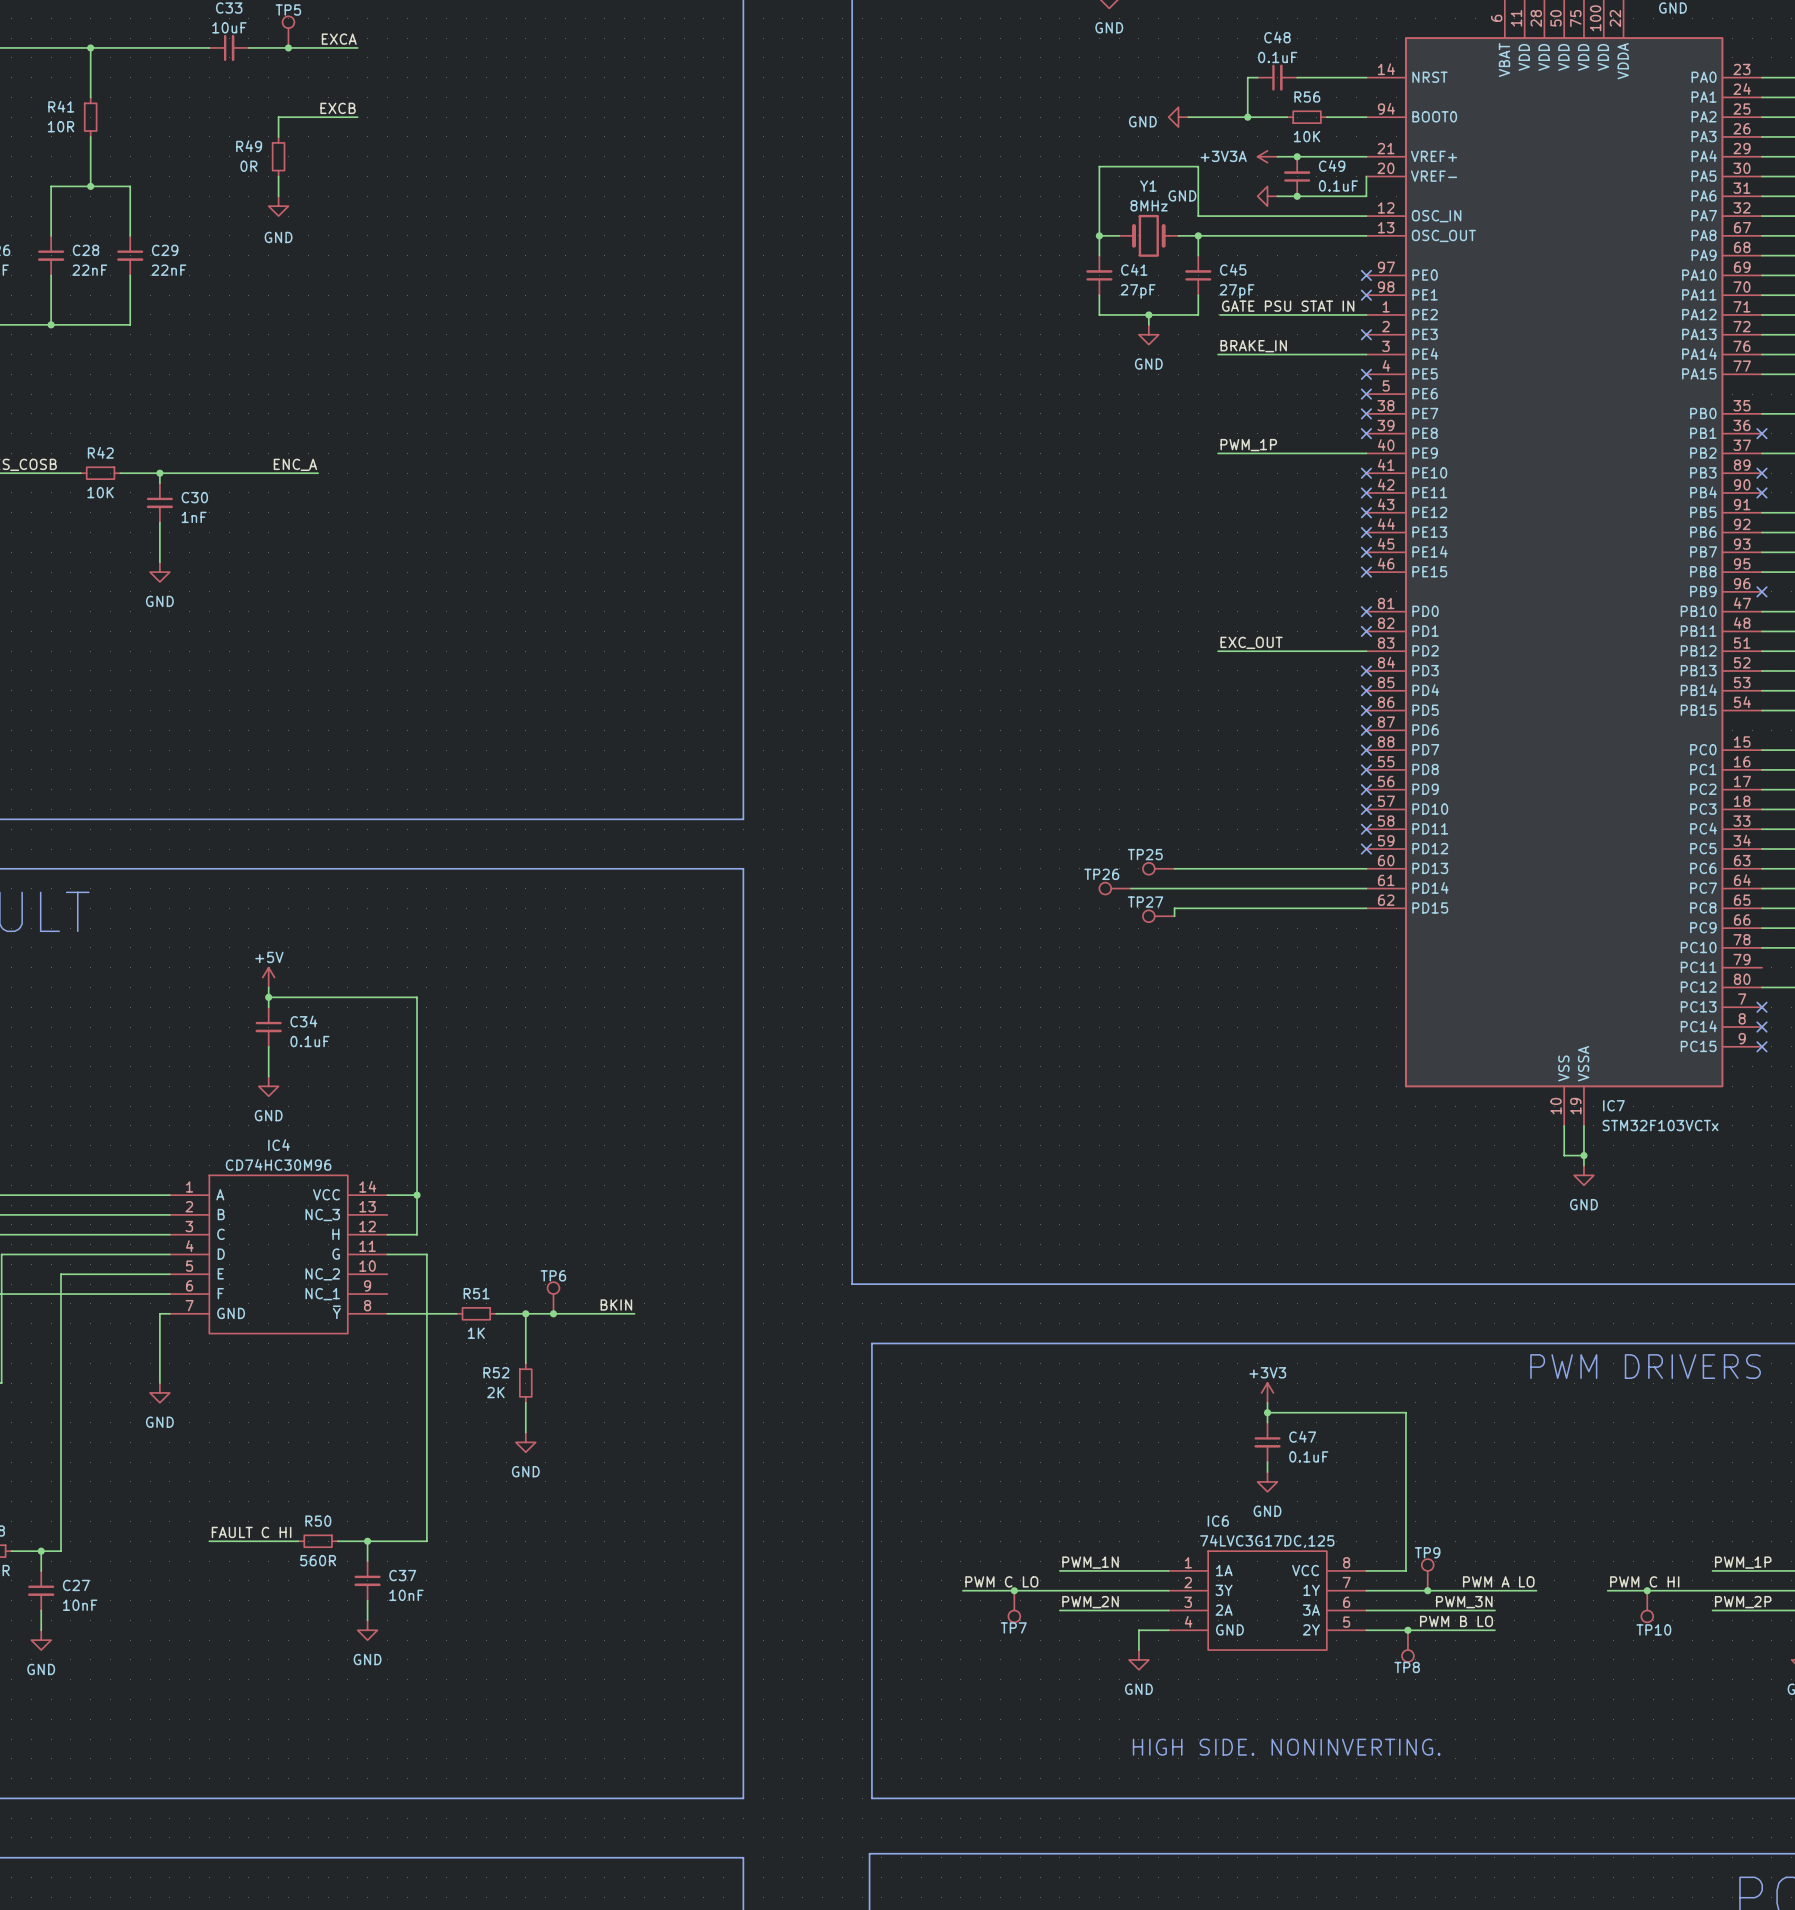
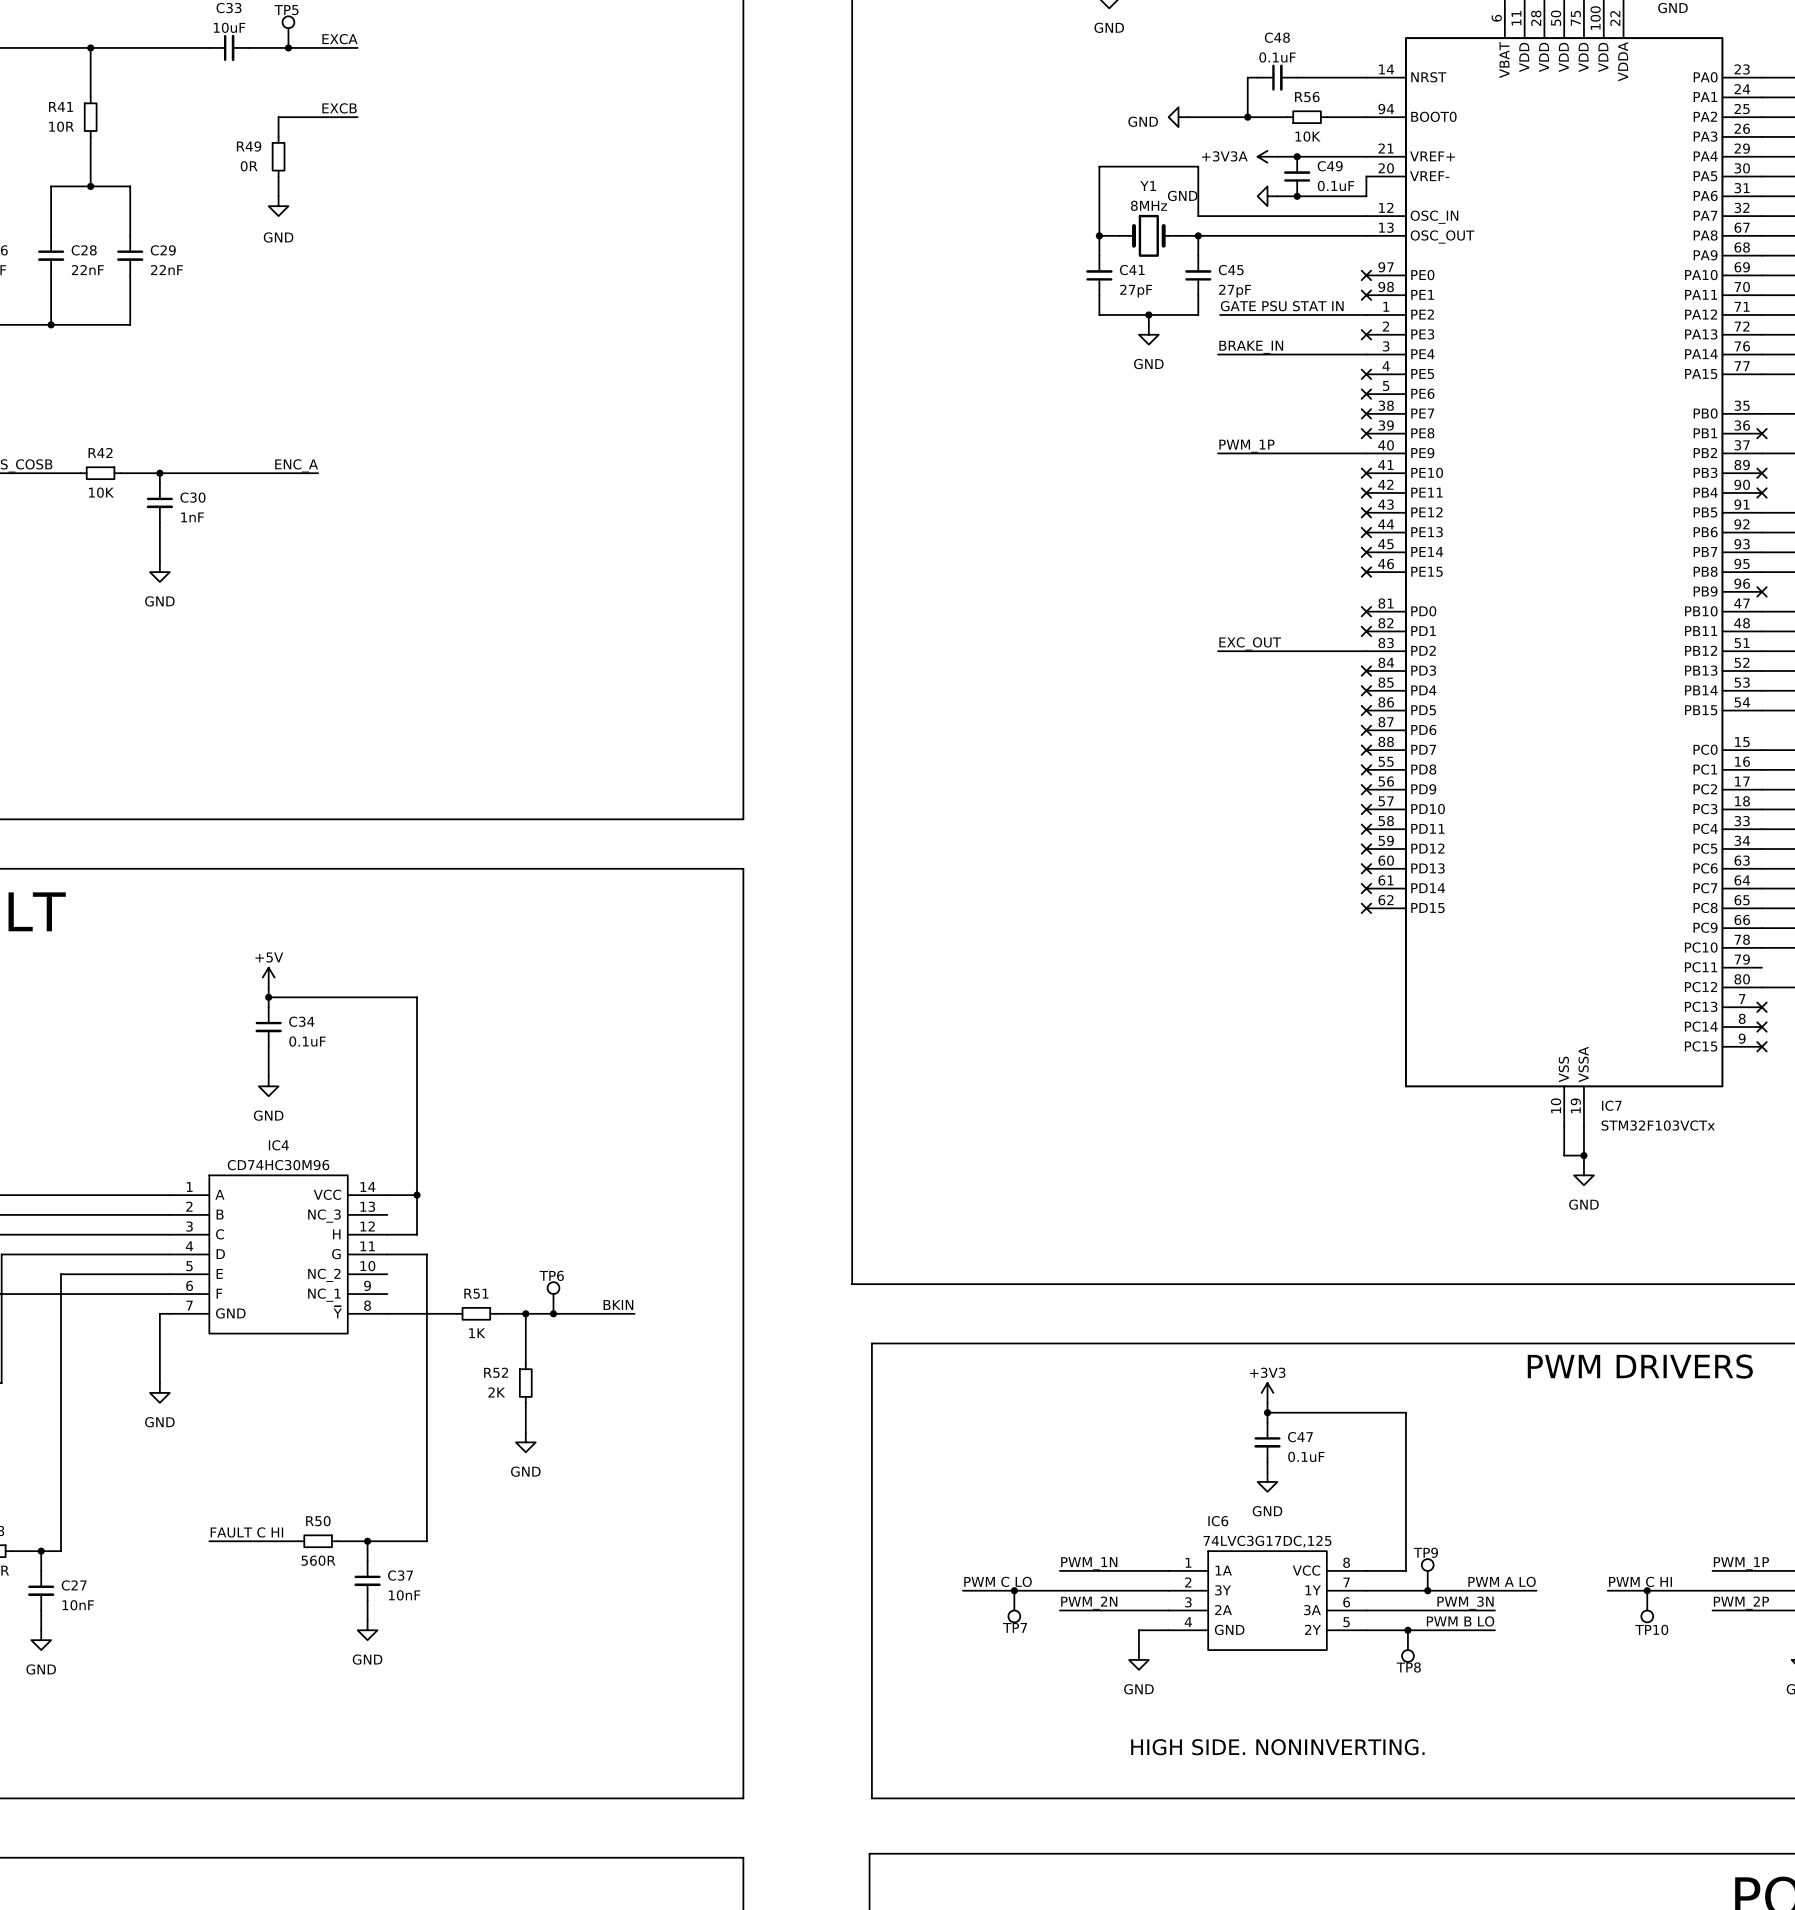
TP25: (1158, 868) -> none
wire: (1174, 868) (1366, 868) -> none
no-connect mark: none -> (1366, 868)
TP26: (1115, 888) -> none
wire: (1131, 888) (1366, 888) -> none
no-connect mark: none -> (1366, 888)
wire: (1366, 908) (1174, 908) (1174, 916) -> none
no-connect mark: none -> (1366, 908)
TP27: (1158, 916) -> none

